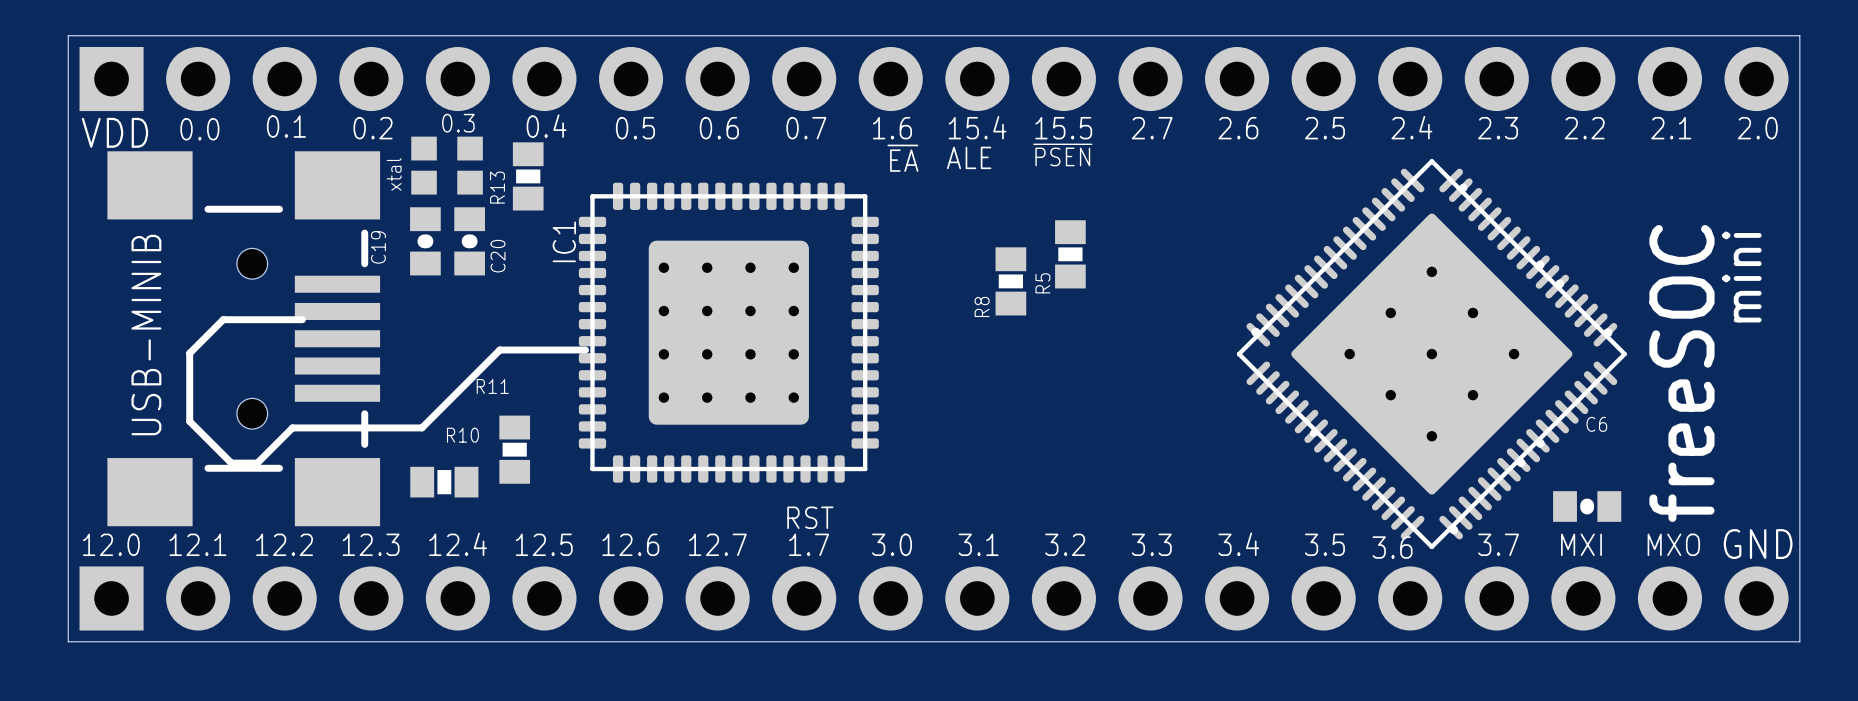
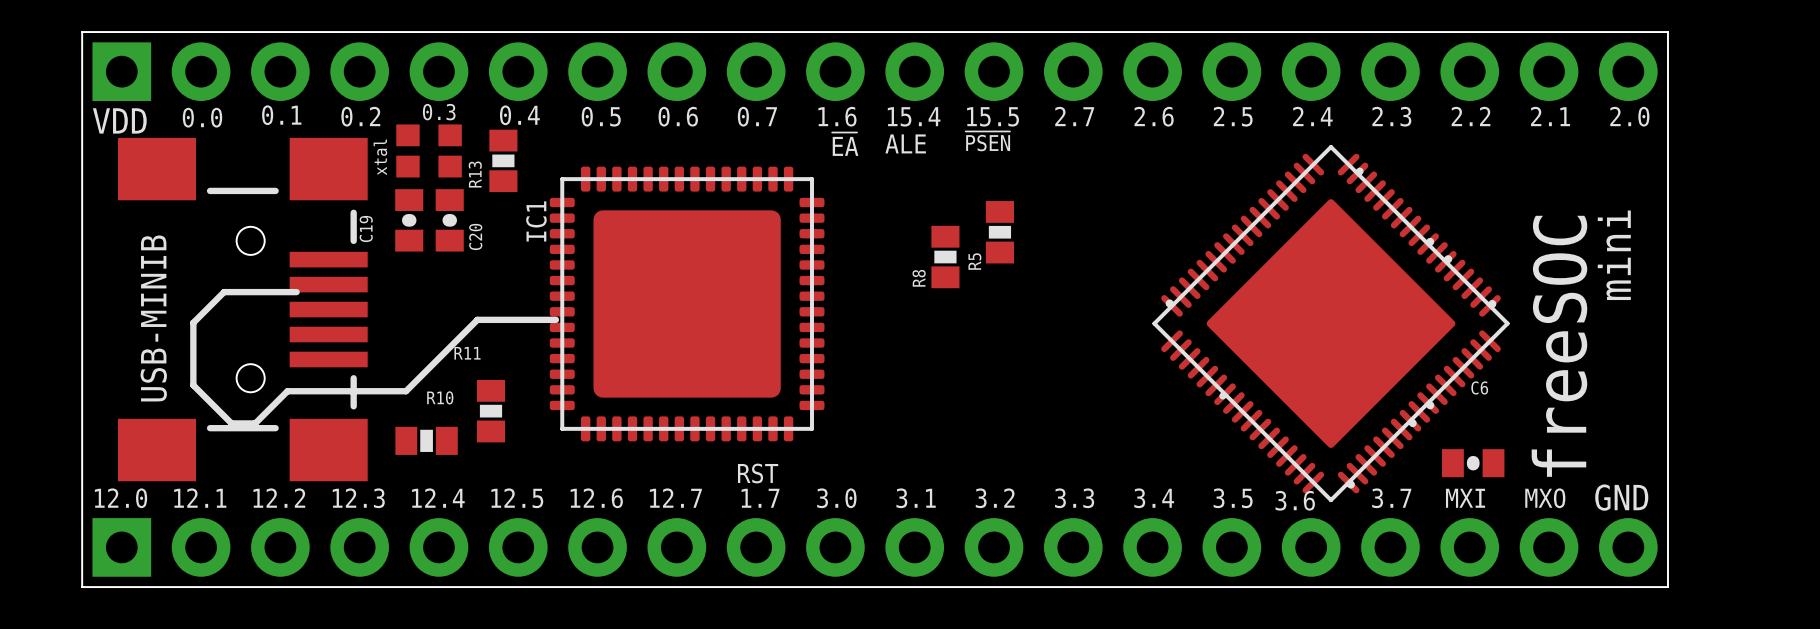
part footprint: [1236, 159, 1627, 550] -> [1152, 144, 1510, 503]
IC1 footprint: [578, 182, 879, 483] -> [549, 166, 825, 442]

